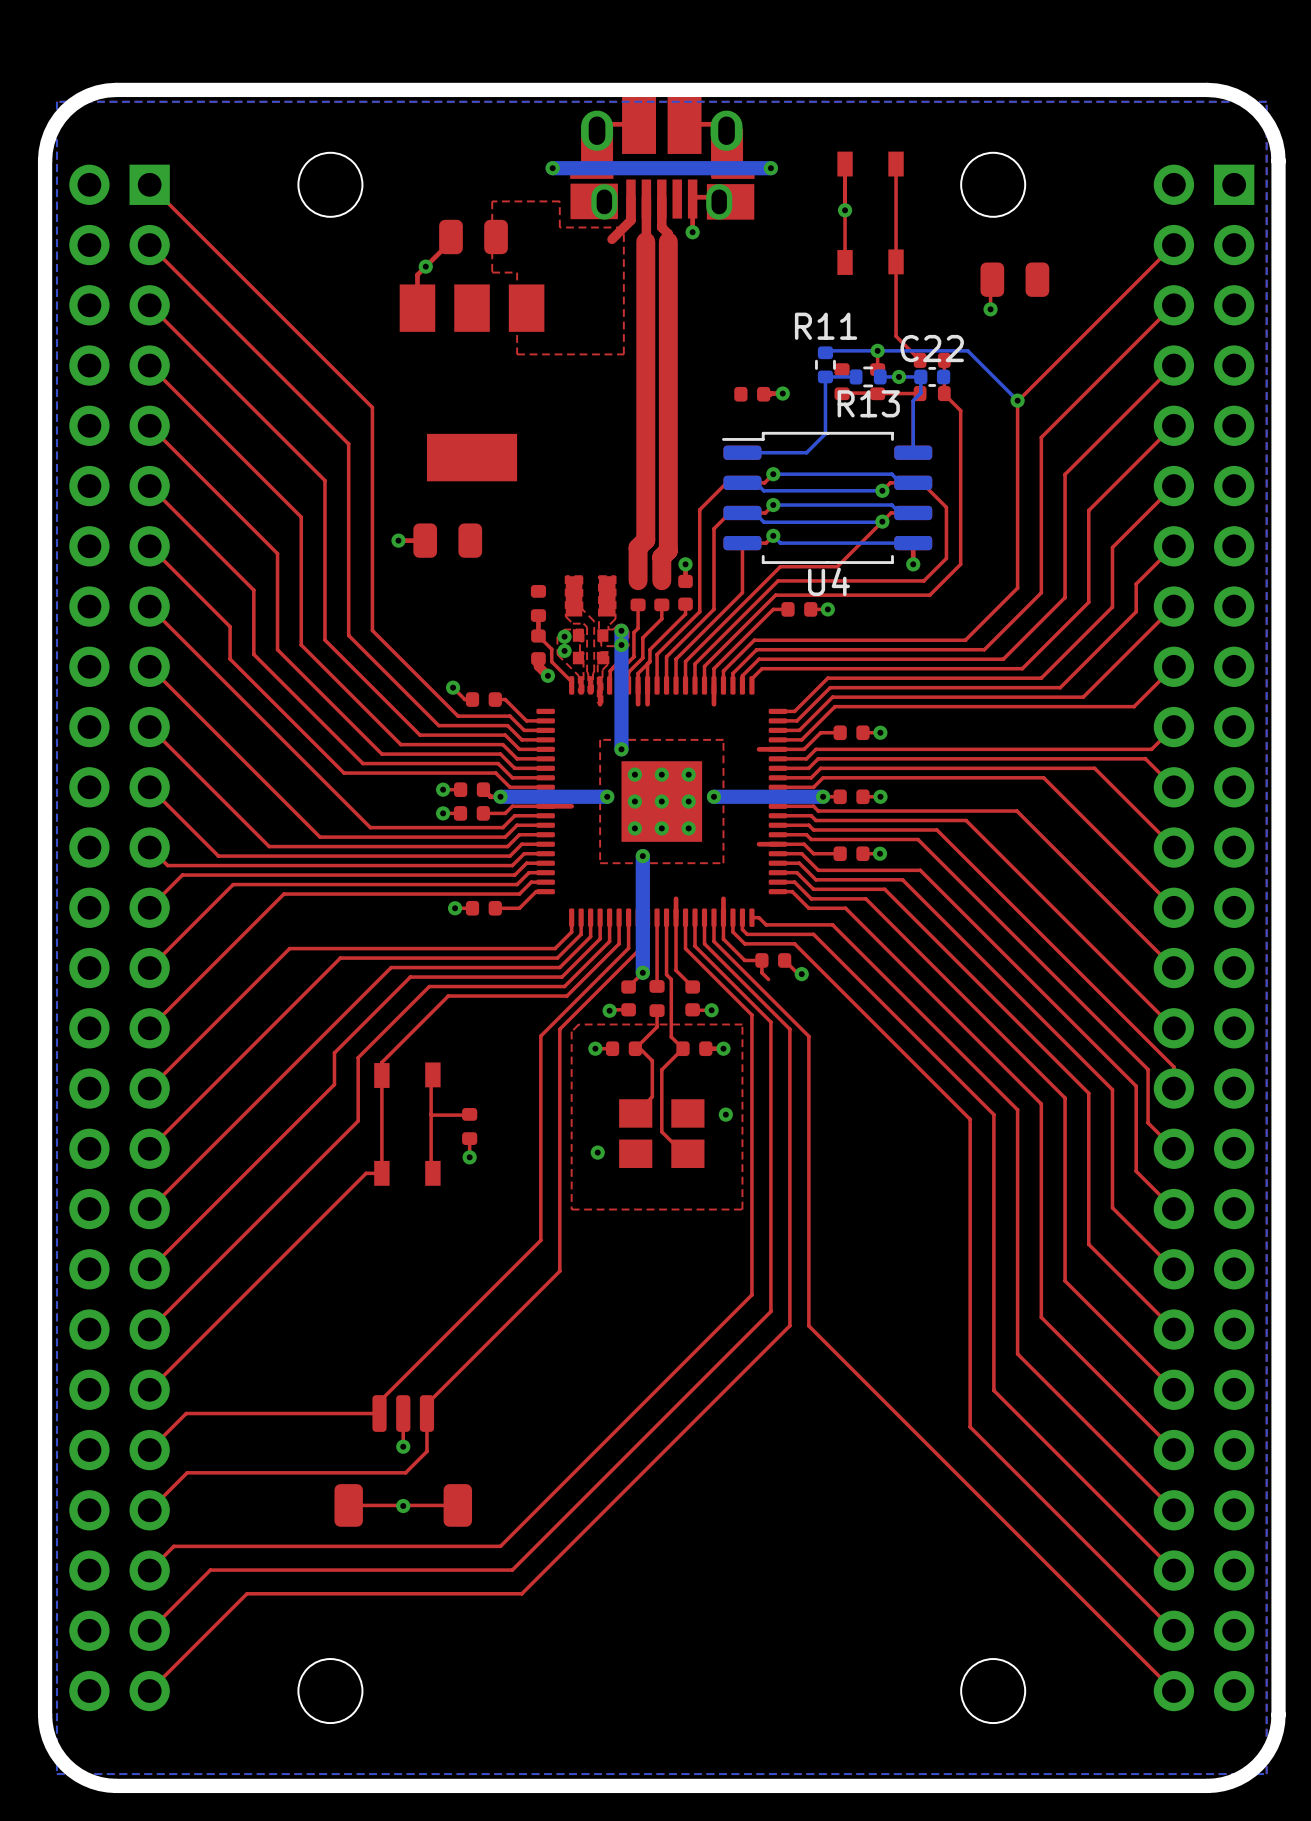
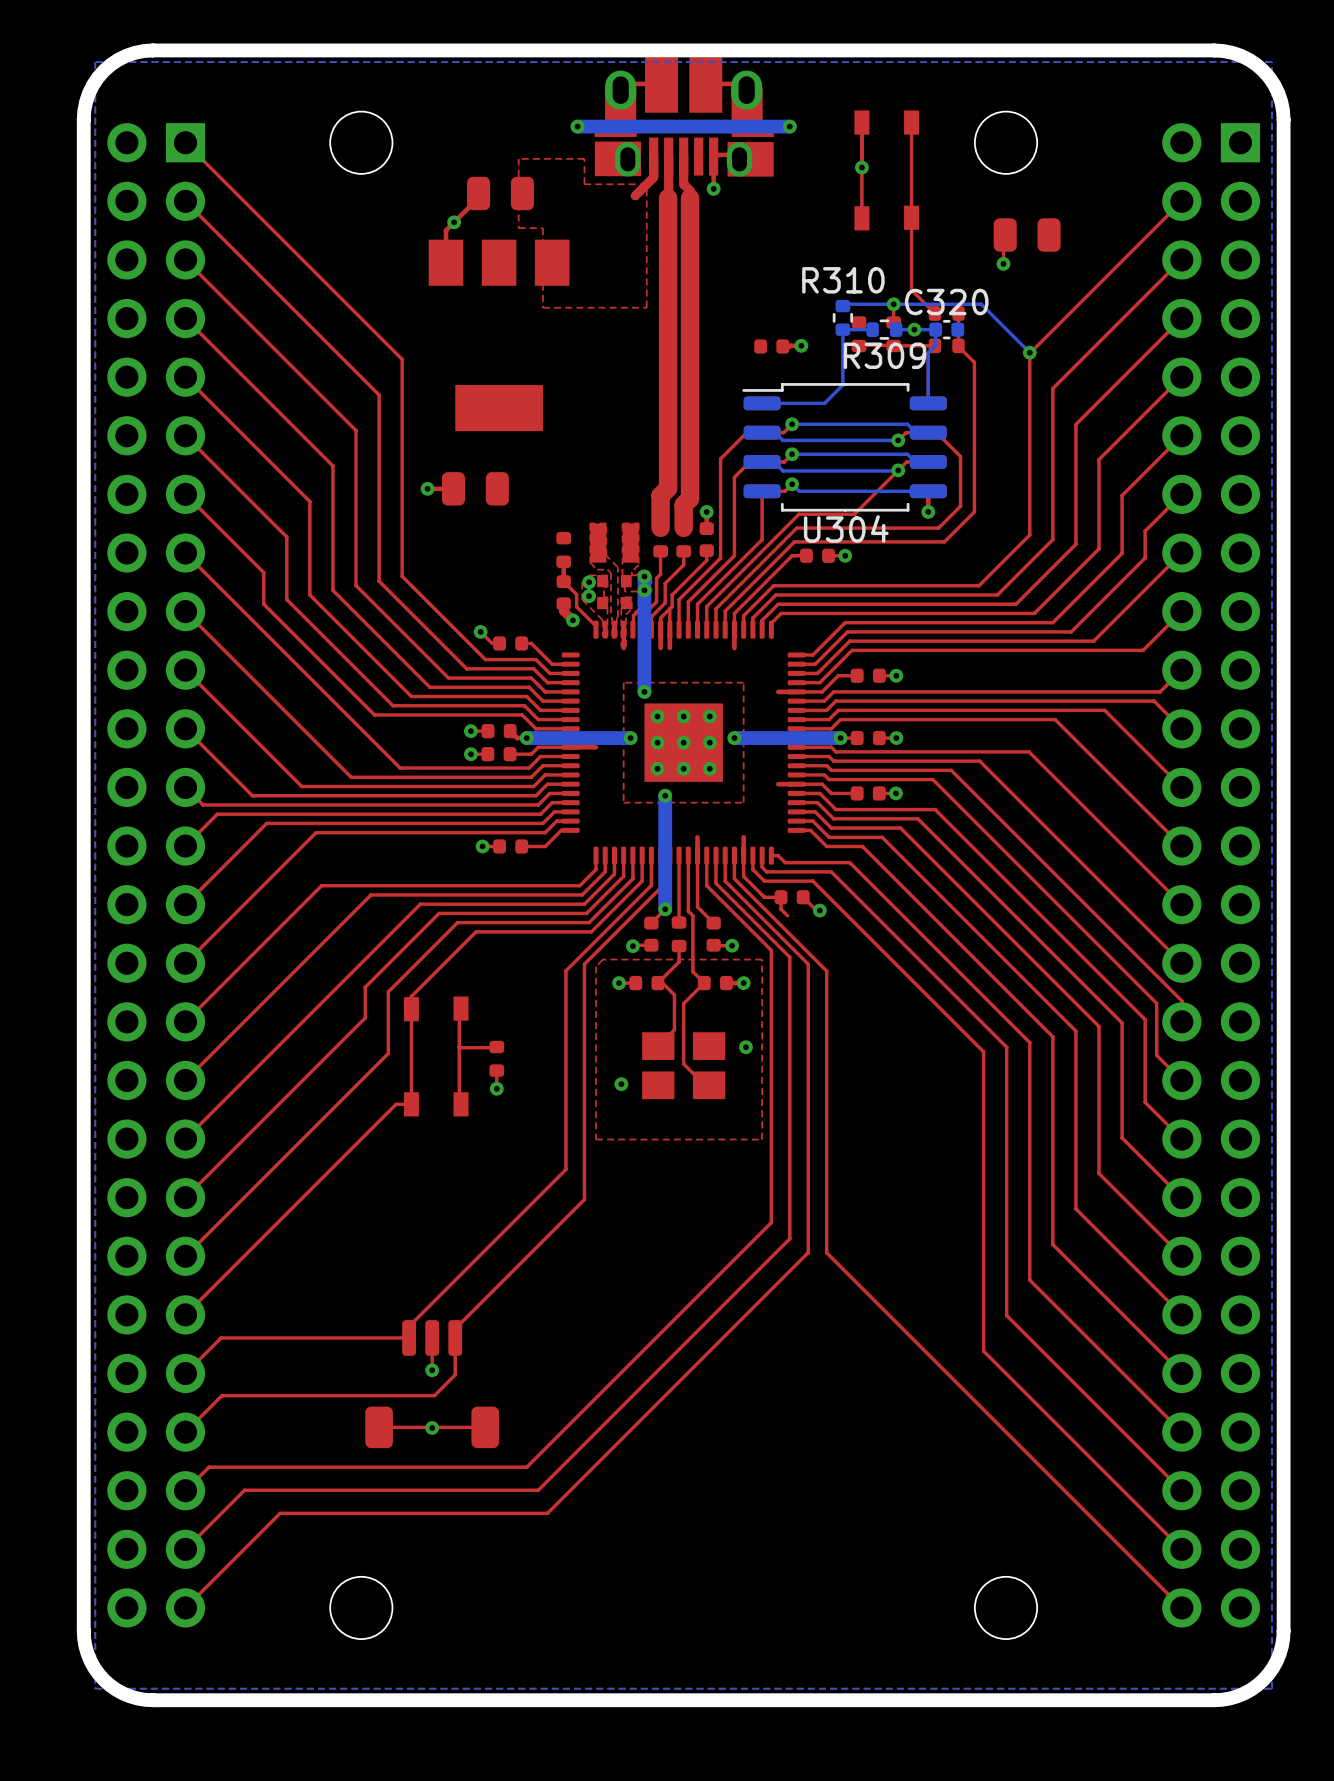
R11 name: R11 (826, 326) -> R310 (843, 280)
C22 name: C22 (932, 348) -> C320 (946, 302)
R13 name: R13 (868, 403) -> R309 (884, 355)
U4 name: U4 (828, 581) -> U304 (846, 528)

